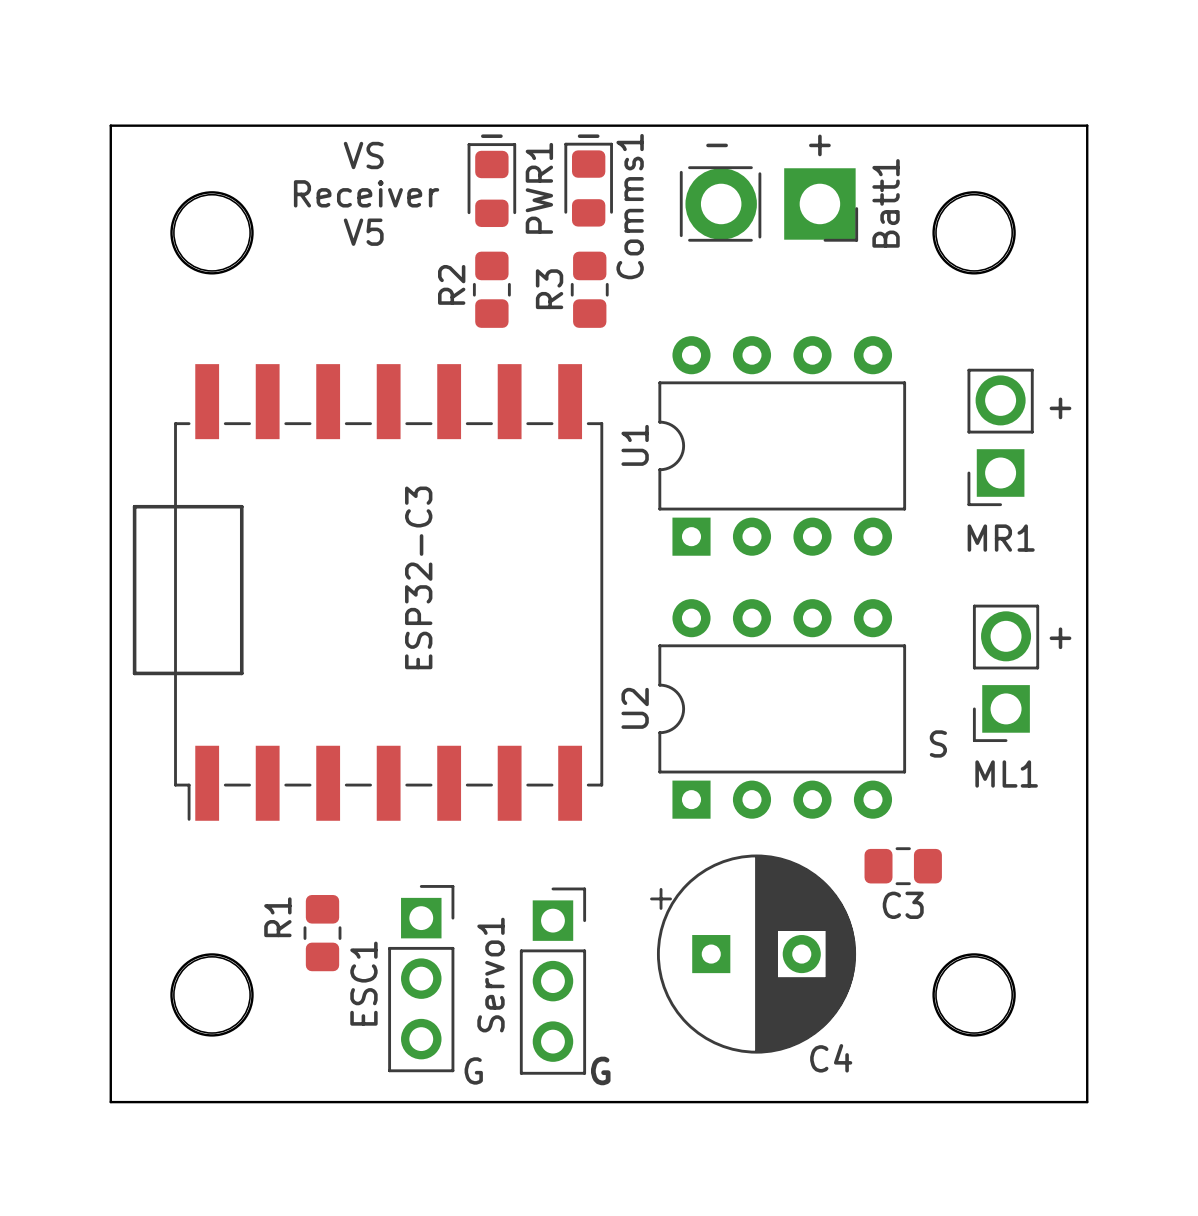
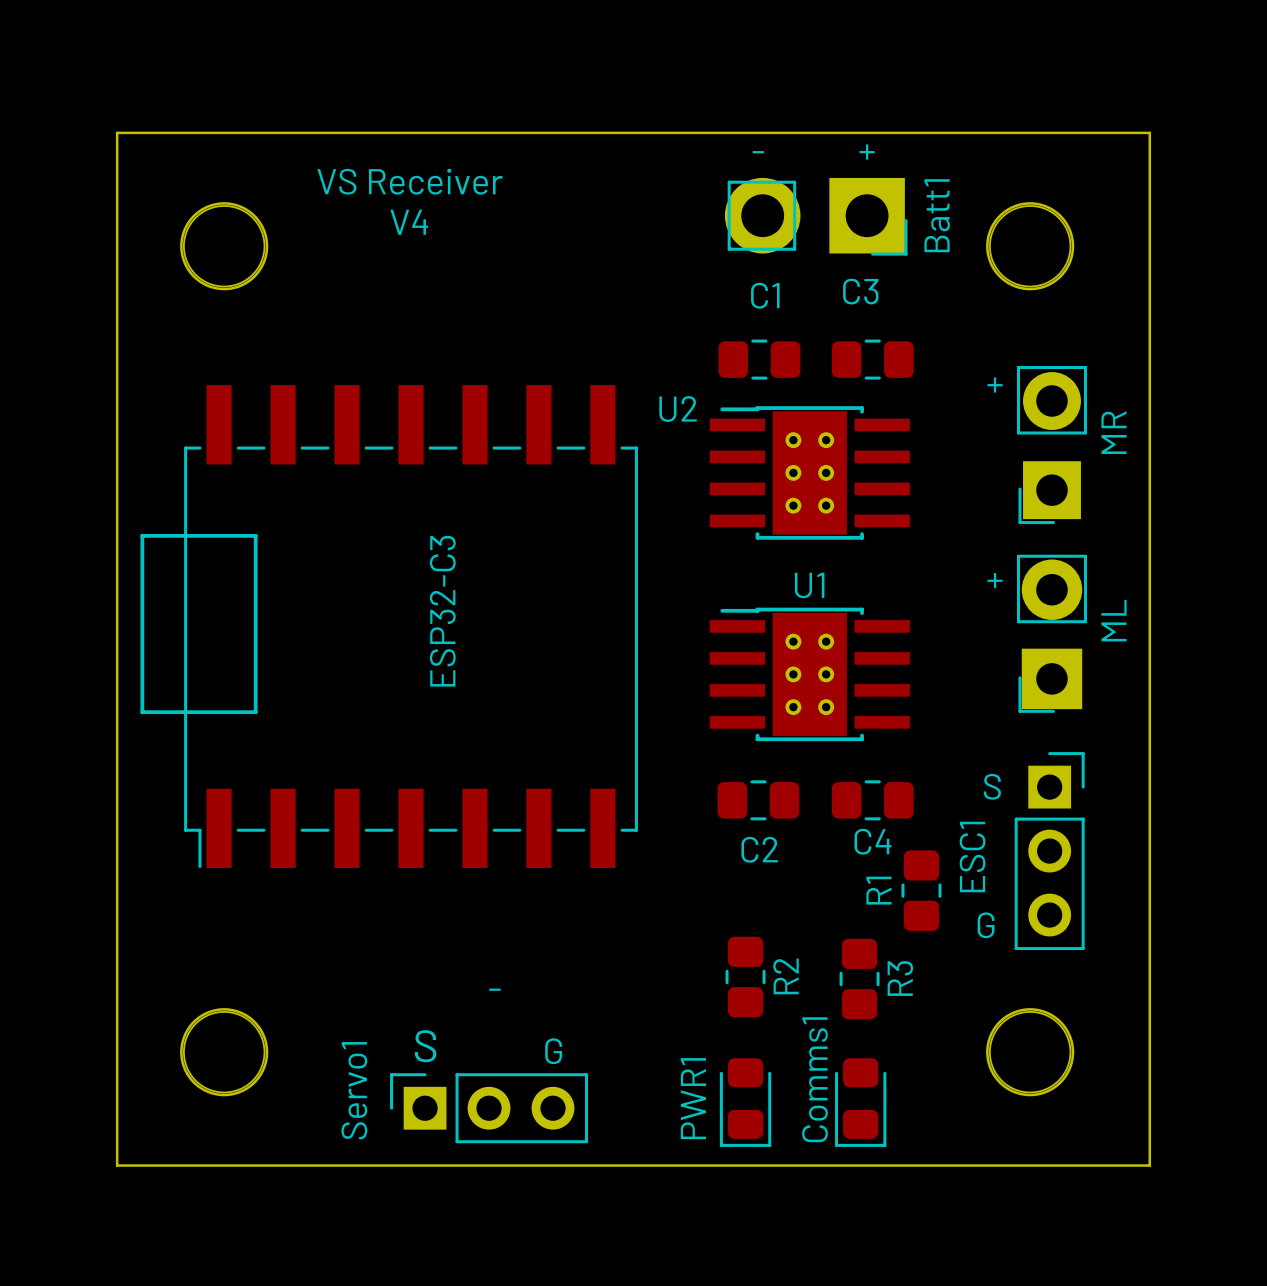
text: - (491, 136) -> none
text: - (588, 136) -> none
text: VS (363, 155) -> none
Batt1 footprint: [679, 166, 859, 242] -> [724, 177, 908, 256]
Comms1 rotation: 0° (588, 184) -> 180° (860, 1102)
Comms1 position: (588, 184) -> (860, 1102)
PWR1 rotation: 0° (491, 185) -> 180° (745, 1102)
PWR1 position: (491, 185) -> (745, 1102)
text: Receiver (366, 193) -> VS Receiver (410, 181)
text: none -> V4 (409, 222)
text: V5 (363, 232) -> none
R2 name position: R2 (451, 284) -> R2 (786, 976)
R2 position: (491, 289) -> (745, 976)
R3 name position: R3 (549, 289) -> R3 (900, 978)
R3 position: (589, 289) -> (859, 979)
U1 footprint: [658, 336, 907, 556] -> [709, 607, 910, 742]
C1: none -> (759, 359)
text: none -> + (995, 385)
text: + (1060, 408) -> none
MR: none -> (1051, 445)
MR1: (1000, 437) -> none
U1 name position: U1 (635, 445) -> U1 (809, 585)
text: none -> + (995, 580)
U2 footprint: [658, 599, 907, 819] -> [709, 406, 910, 540]
ML: none -> (1051, 633)
text: + (1060, 638) -> none
ML1: (1006, 673) -> none
U2 name position: U2 (635, 708) -> U2 (678, 409)
C2: none -> (758, 800)
C4 footprint: [650, 854, 857, 1054] -> [831, 780, 914, 821]
C3 position: (903, 866) -> (872, 359)
text: none -> G (986, 925)
C3 name position: C3 (903, 905) -> C3 (860, 291)
R1 name position: R1 (277, 917) -> R1 (878, 890)
R1 position: (322, 933) -> (921, 890)
text: none -> - (494, 989)
Servo1 name position: Servo1 (490, 975) -> Servo1 (354, 1090)
ESC1 position: (421, 978) -> (1049, 851)
Servo1 rotation: 0° (552, 981) -> 90° counterclockwise (489, 1108)
Servo1 position: (552, 981) -> (489, 1108)
ESC1 name position: ESC1 (363, 983) -> ESC1 (972, 856)
text: none -> S (425, 1046)
text: none -> G (553, 1051)
C4 name position: C4 (831, 1058) -> C4 (872, 841)
text: G (473, 1070) -> none
text: G (600, 1070) -> none

